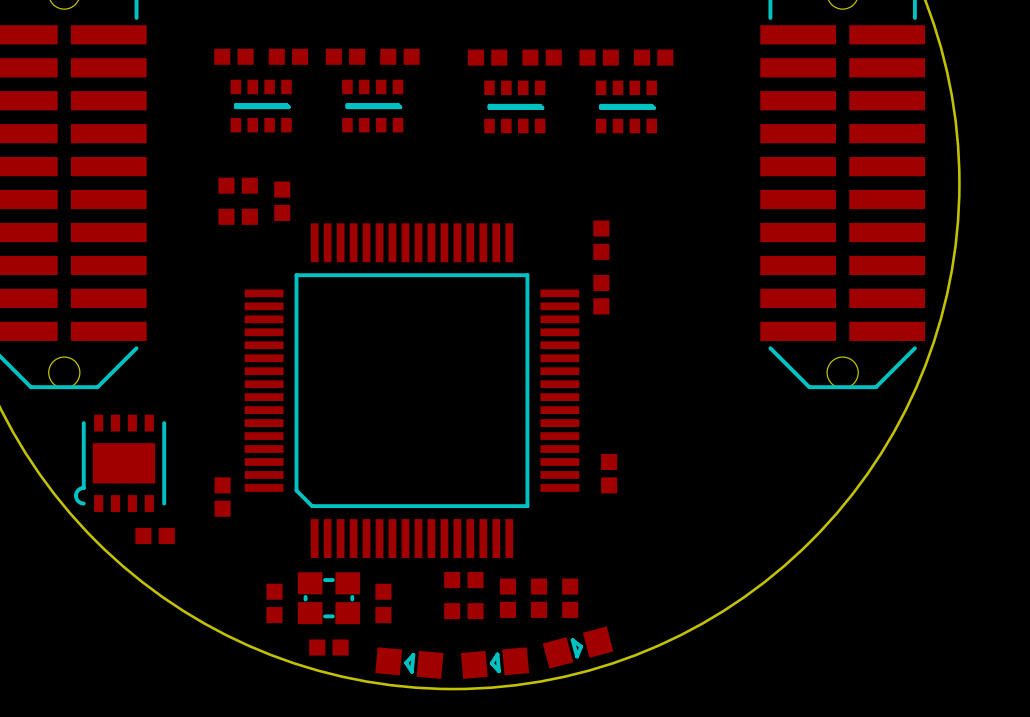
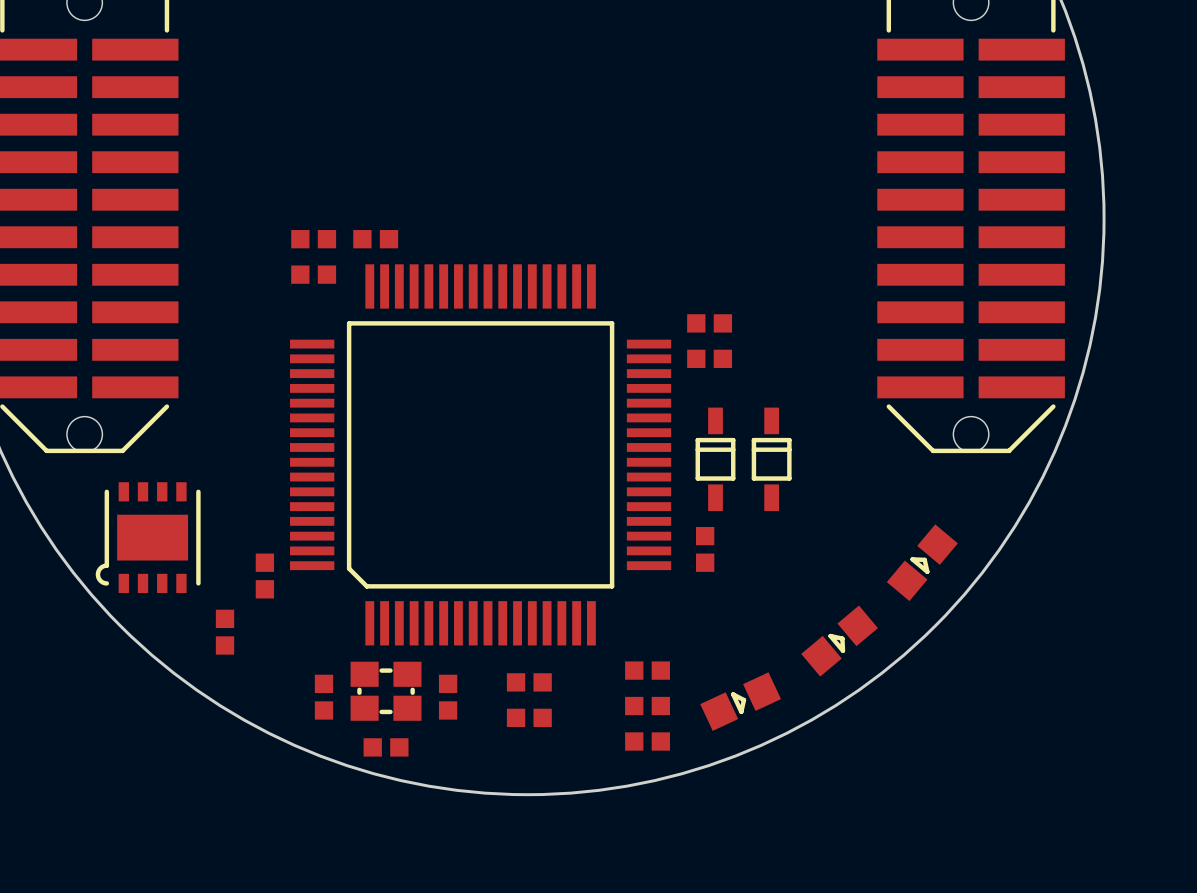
part: (233, 56) -> none
part: (288, 56) -> none
part: (345, 56) -> none
part: (399, 56) -> none
part: (487, 57) -> none
part: (542, 57) -> none
part: (599, 57) -> none
part: (653, 57) -> none
part: (261, 106) -> none
part: (372, 106) -> none
part: (514, 106) -> none
part: (626, 106) -> none
part: (238, 185) -> none
part: none -> (313, 239)
part: (282, 201) -> none
part: none -> (375, 239)
part: (238, 216) -> none
part: none -> (313, 274)
part: (601, 240) -> none
part: none -> (709, 323)
part: (601, 294) -> none
part: none -> (709, 358)
part: none -> (715, 459)
part: none -> (771, 459)
part: none -> (922, 562)
part rotation: 0° (155, 535) -> 90° clockwise (225, 632)
part position: (155, 535) -> (225, 632)
part: none -> (839, 641)
part: (463, 580) -> none
part: none -> (647, 670)
part: none -> (529, 682)
part: (507, 598) -> none
part: (539, 598) -> none
part: (570, 598) -> none
part: none -> (740, 701)
part: (463, 611) -> none
part: none -> (647, 706)
part: none -> (529, 717)
part footprint: [542, 626, 614, 669] -> [625, 732, 671, 751]
part: (409, 663) -> none
part: (494, 663) -> none

